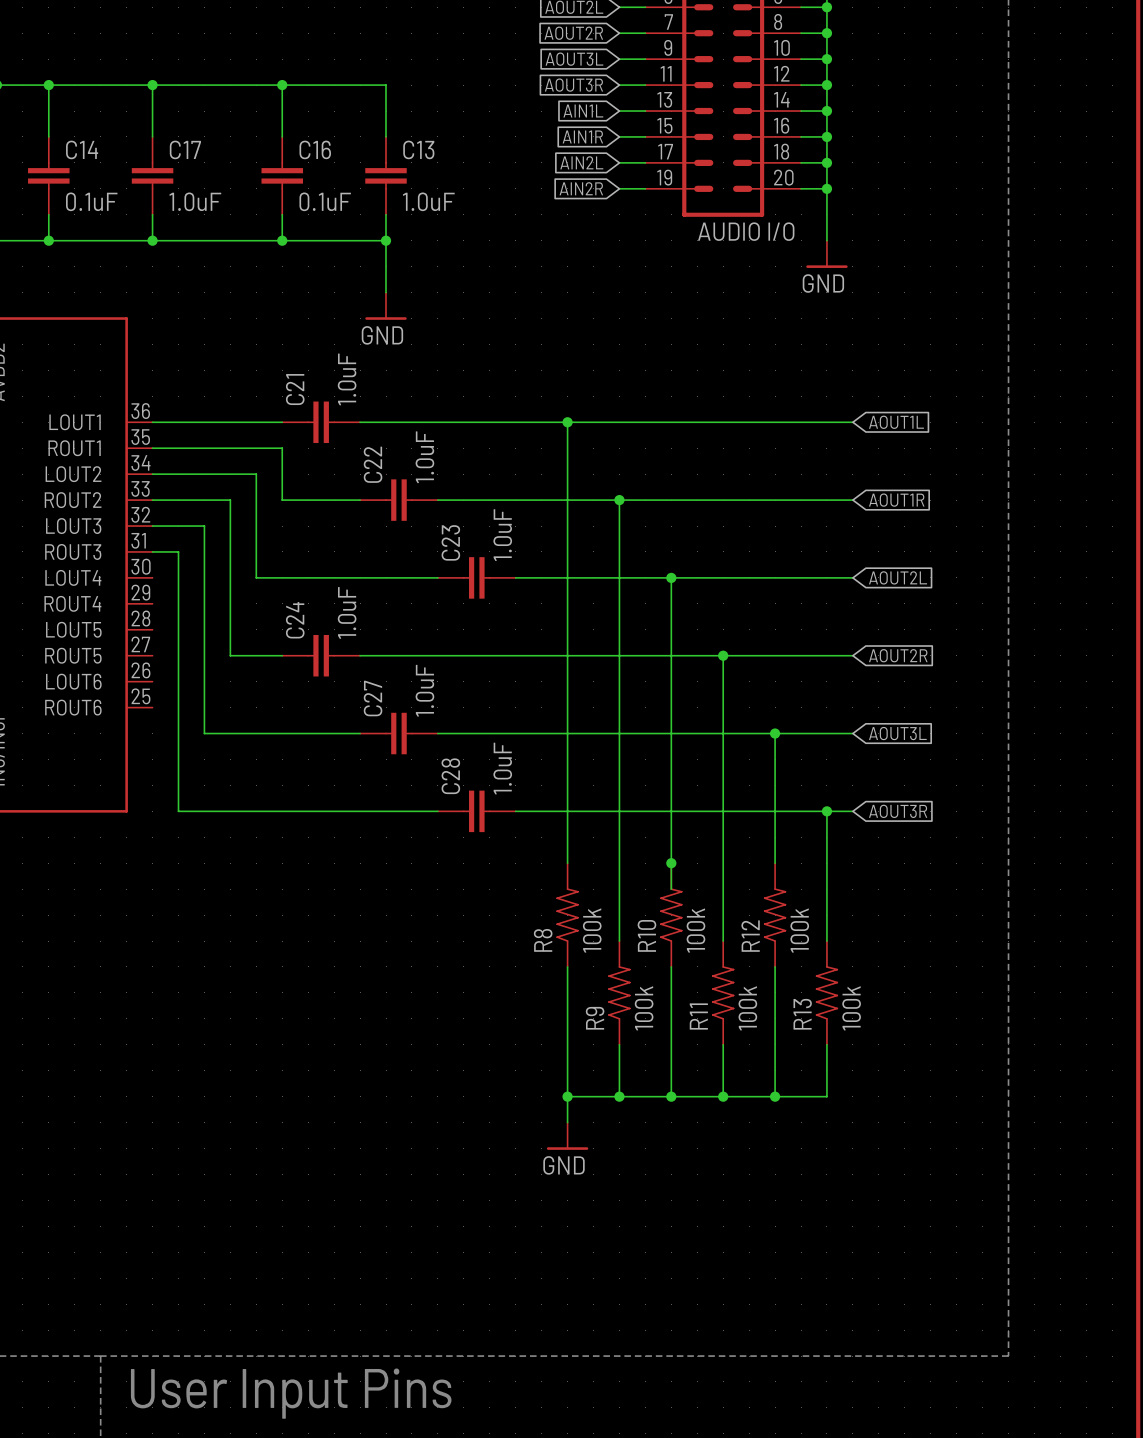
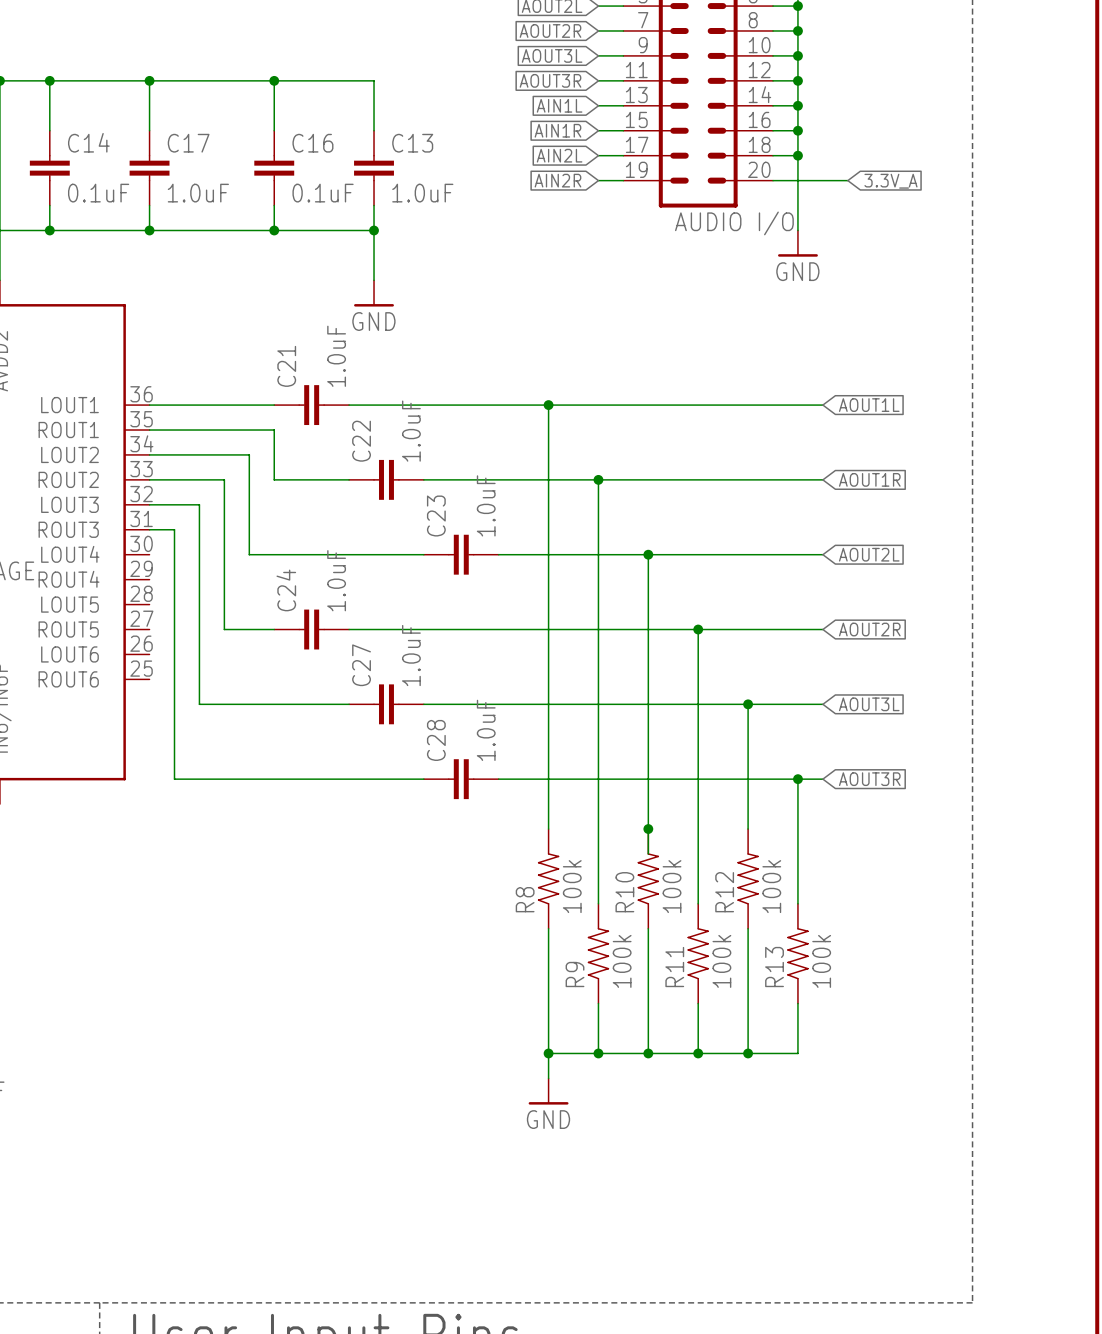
wire: none -> (797, 180) (847, 180)
junction: (826, 188) -> none
global label: none -> 3.3V_A (890, 181)

